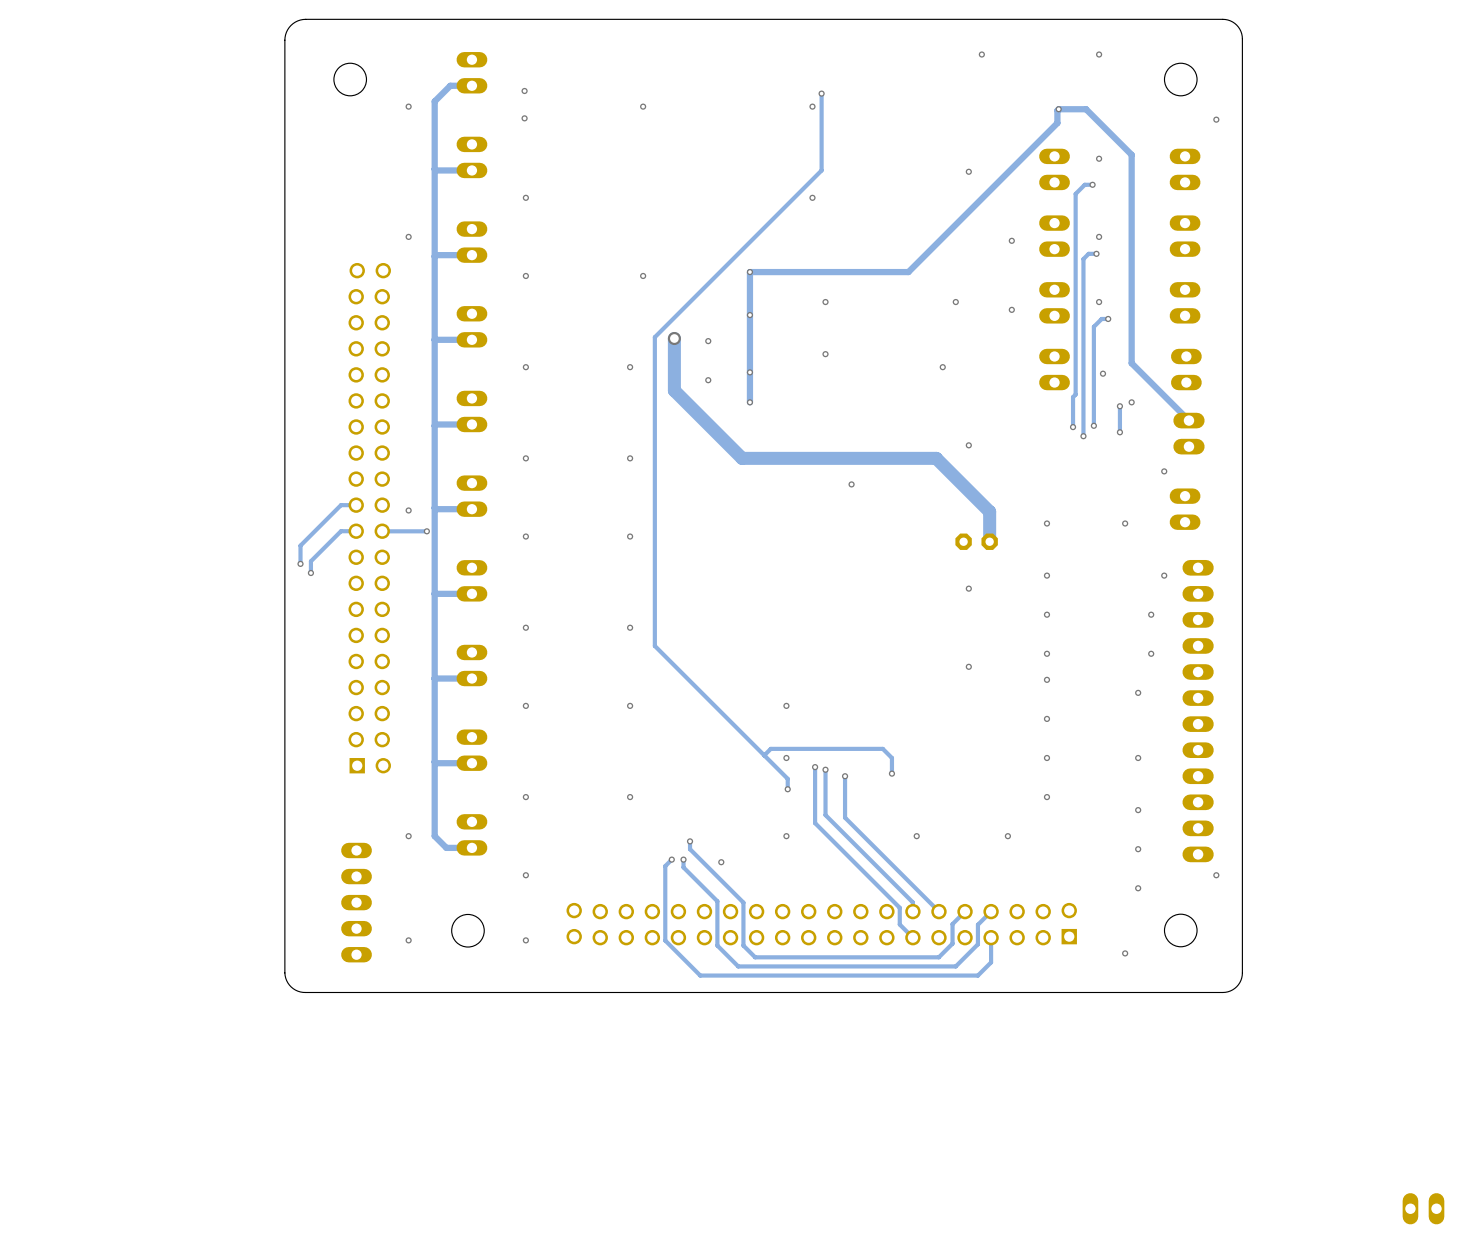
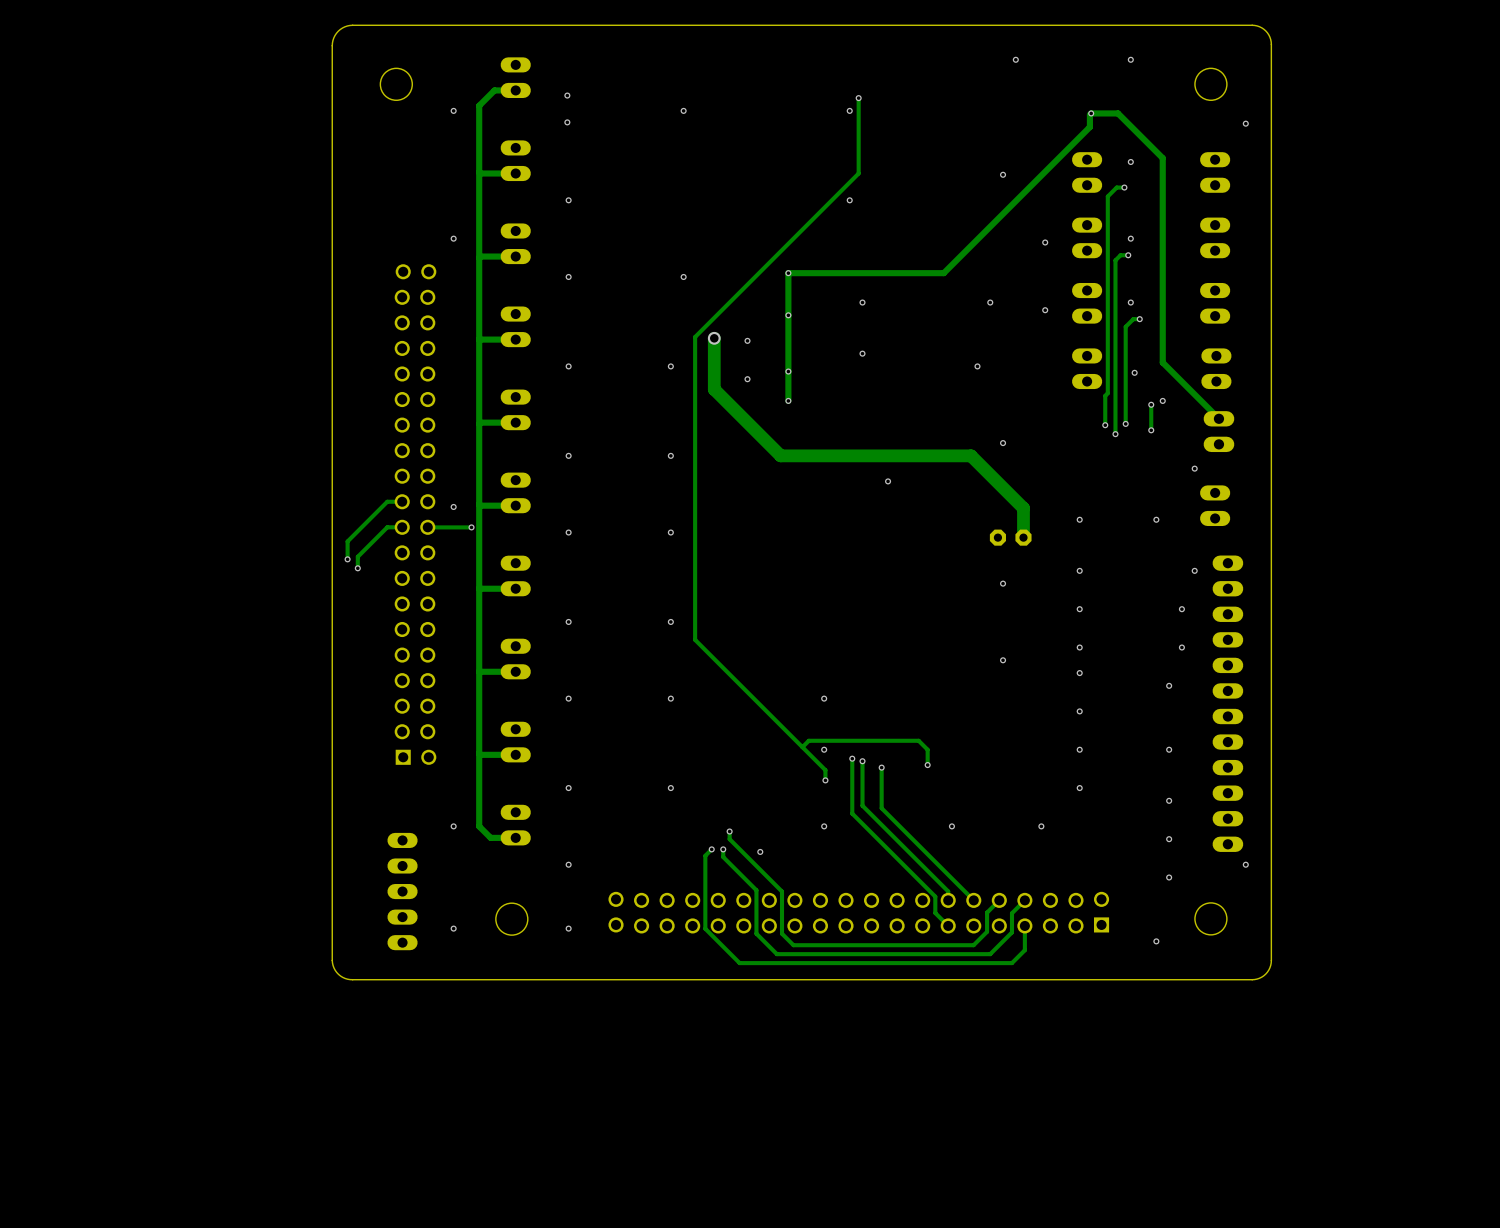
part: (1423, 1208) -> none

